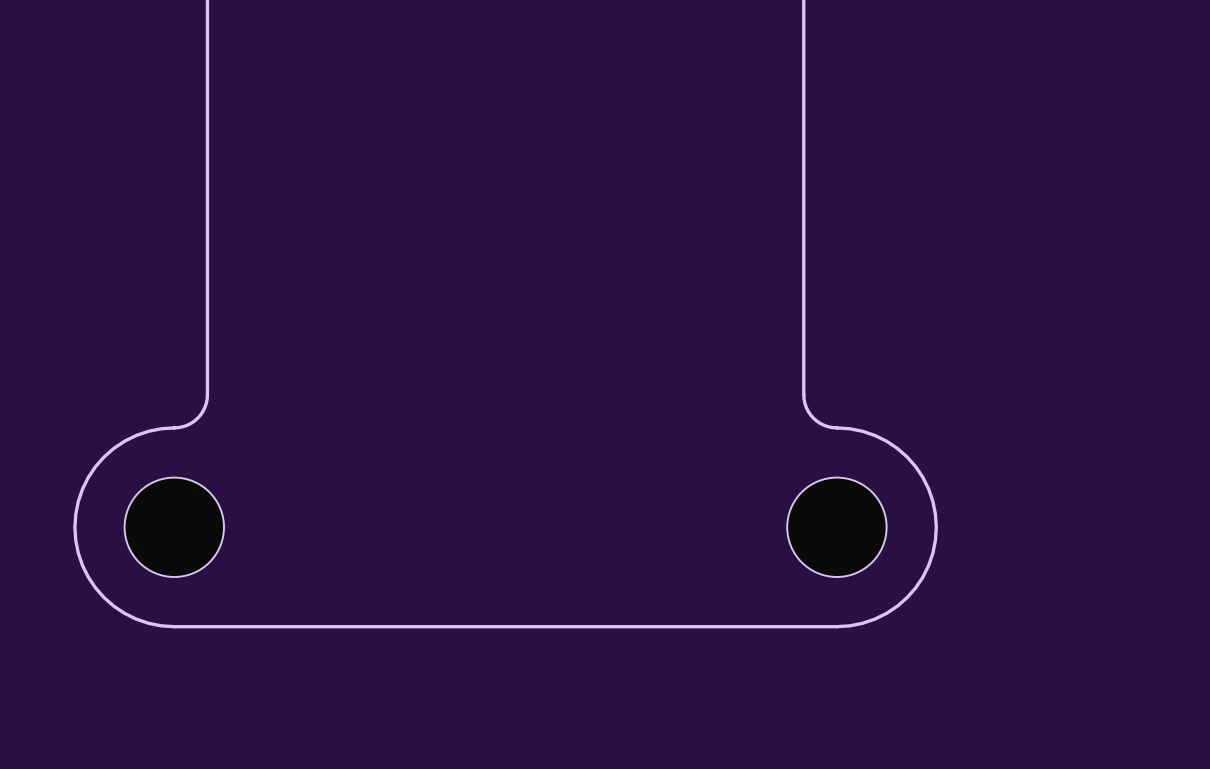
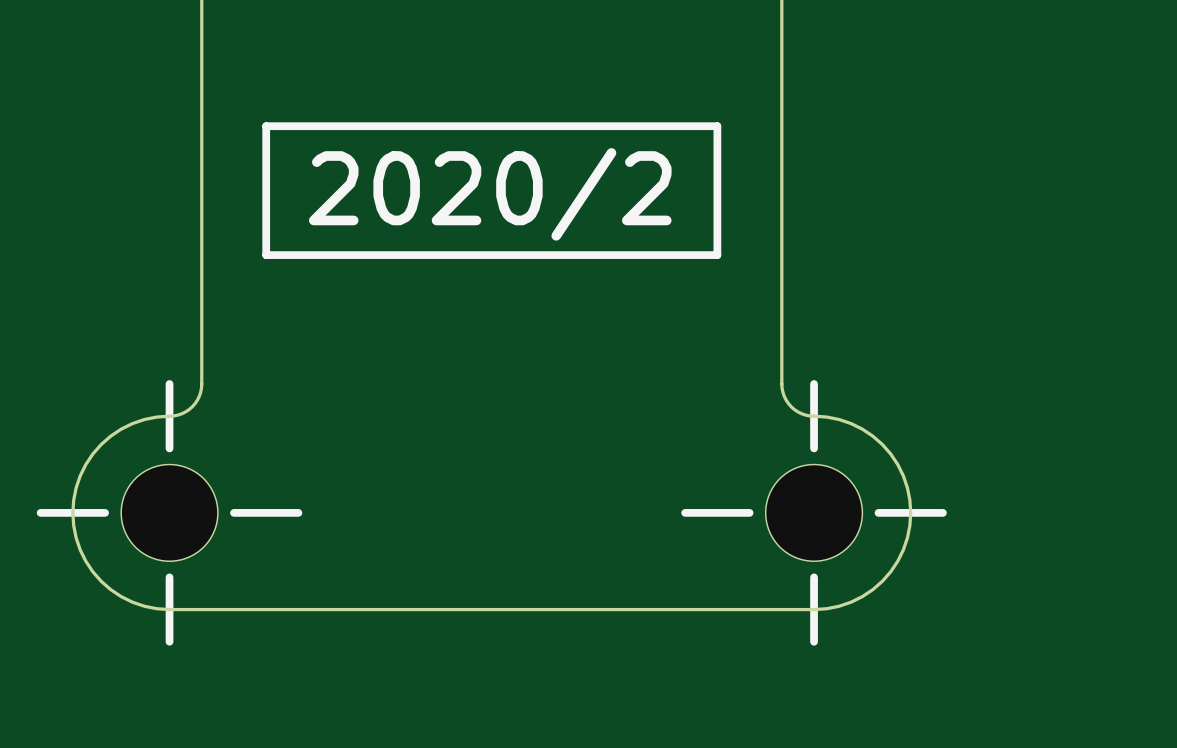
line: none -> (717, 126) (717, 255) (266, 255) (266, 126) (717, 126)
text: none -> 2020/2 (490, 194)
part side: top (174, 527) -> bottom (169, 512)
part side: top (836, 527) -> bottom (814, 512)

